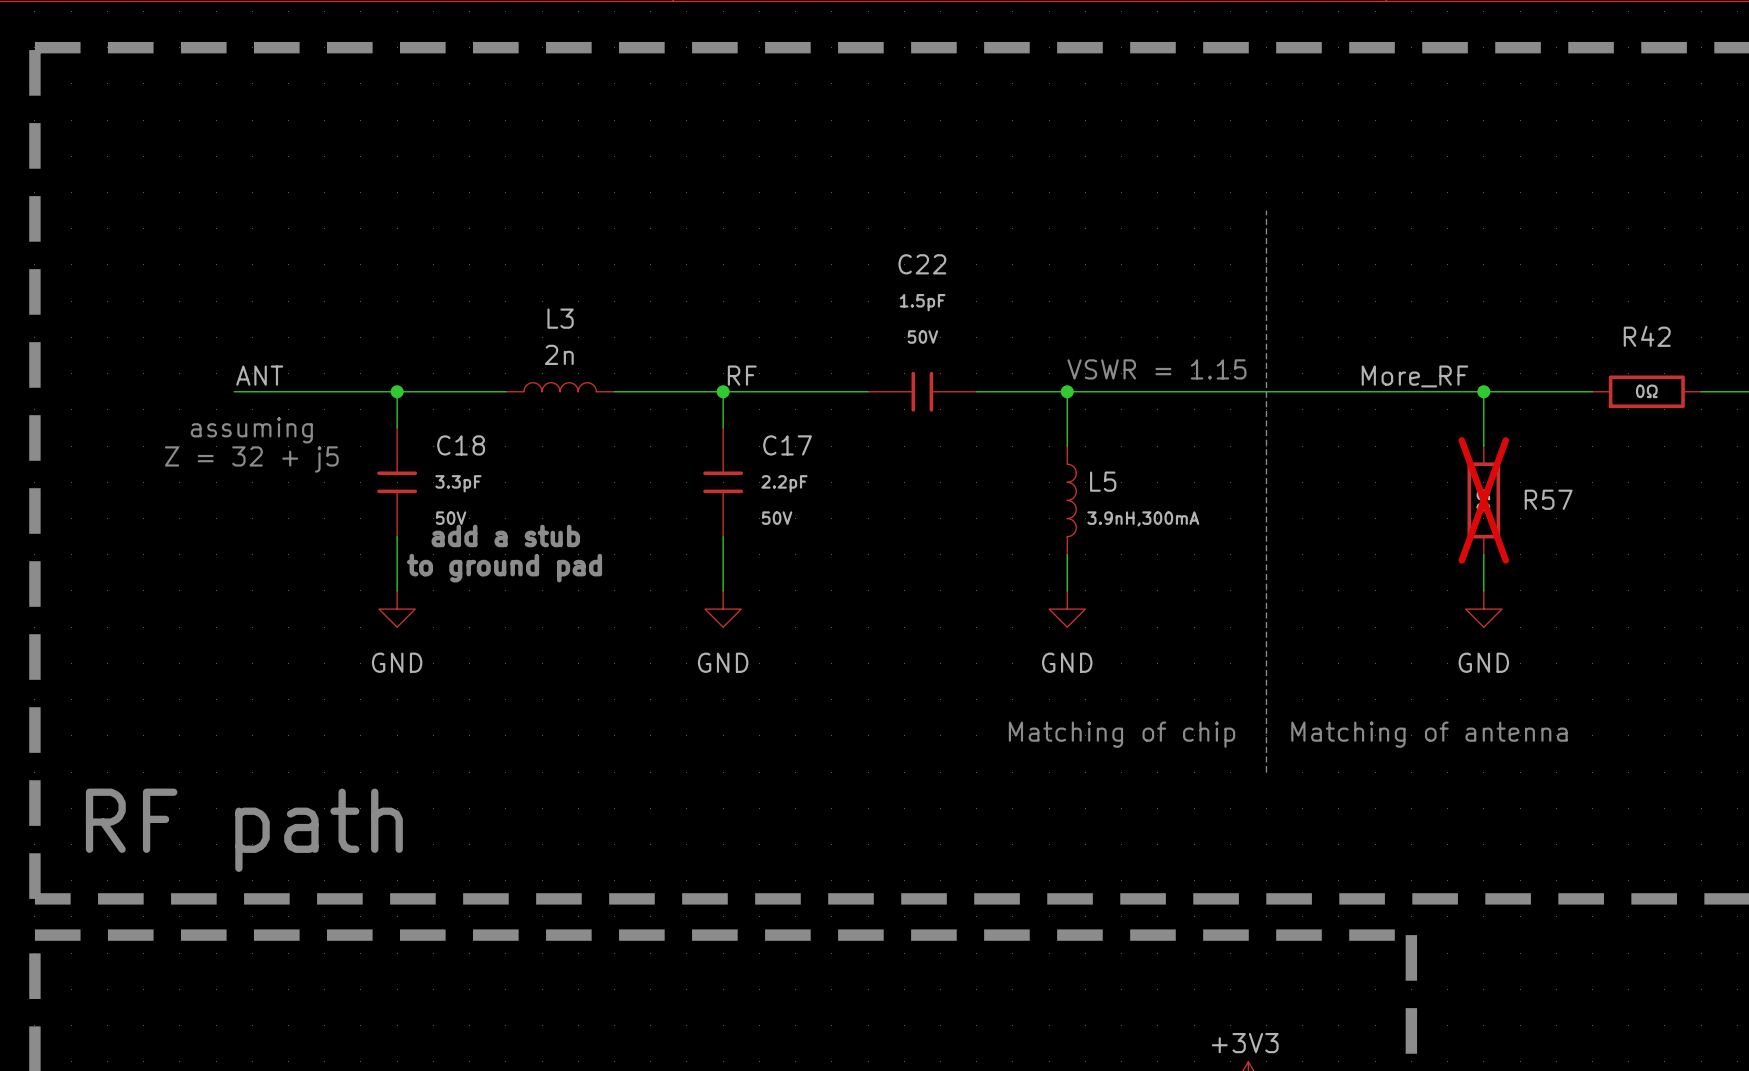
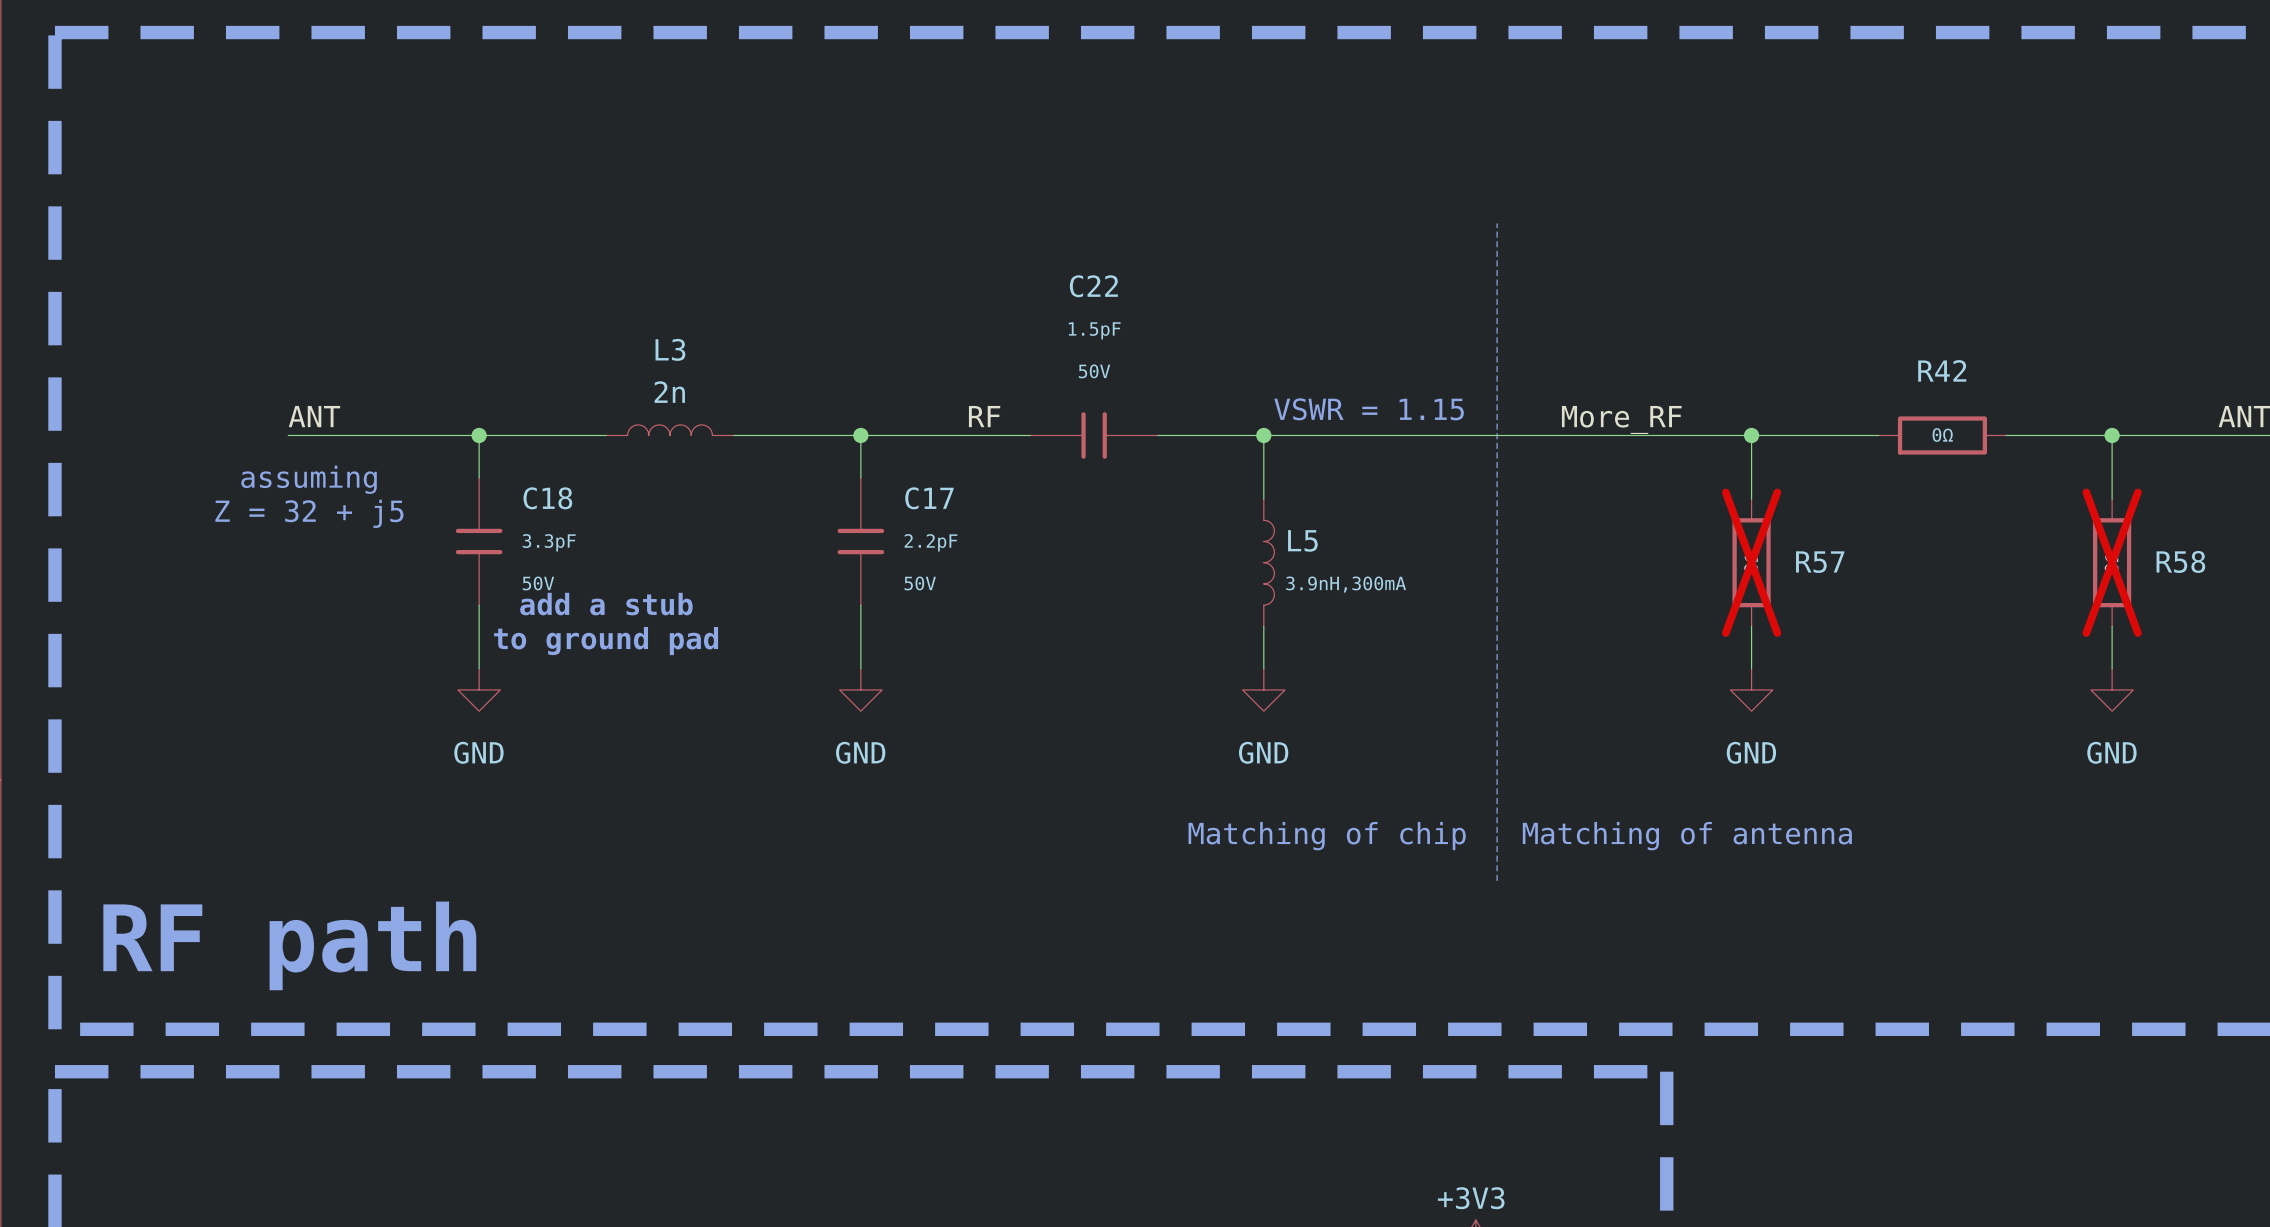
label position: RF (742, 375) -> RF (984, 416)
label position: More_RF (1414, 376) -> More_RF (1621, 419)

